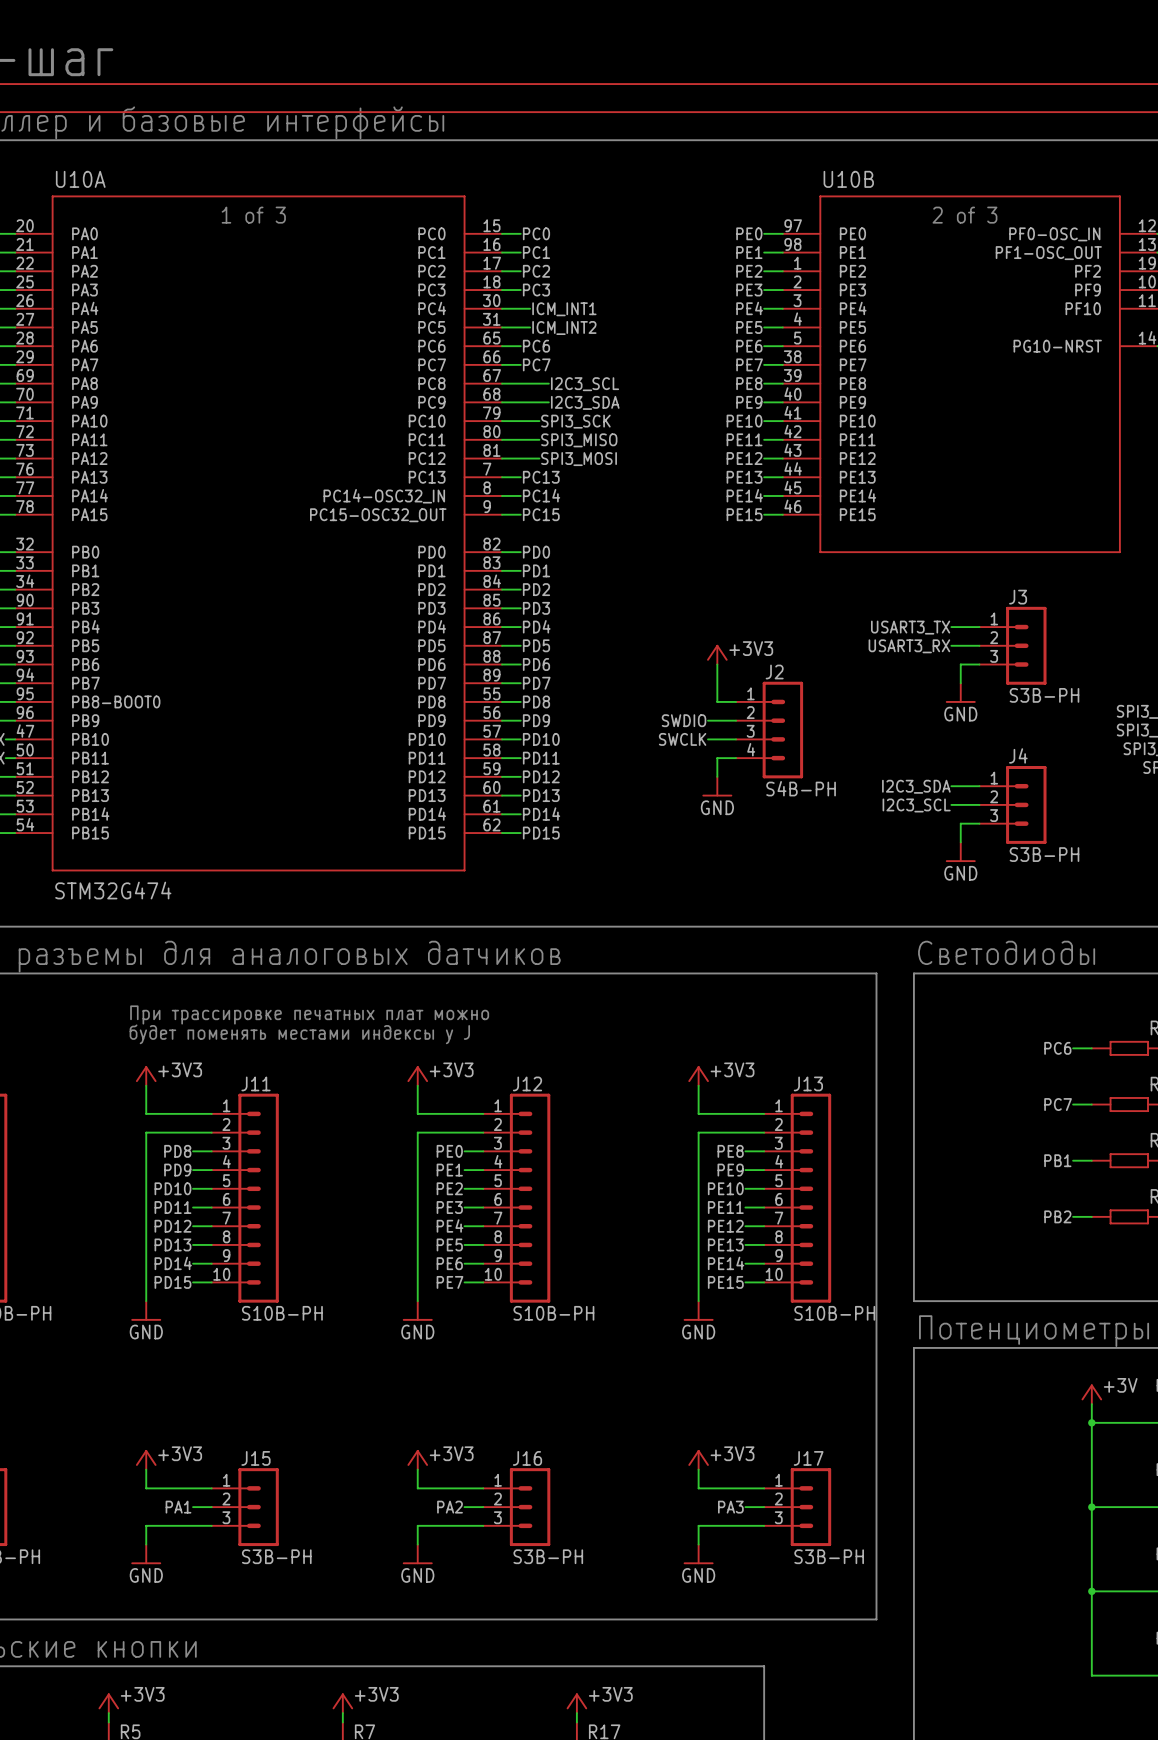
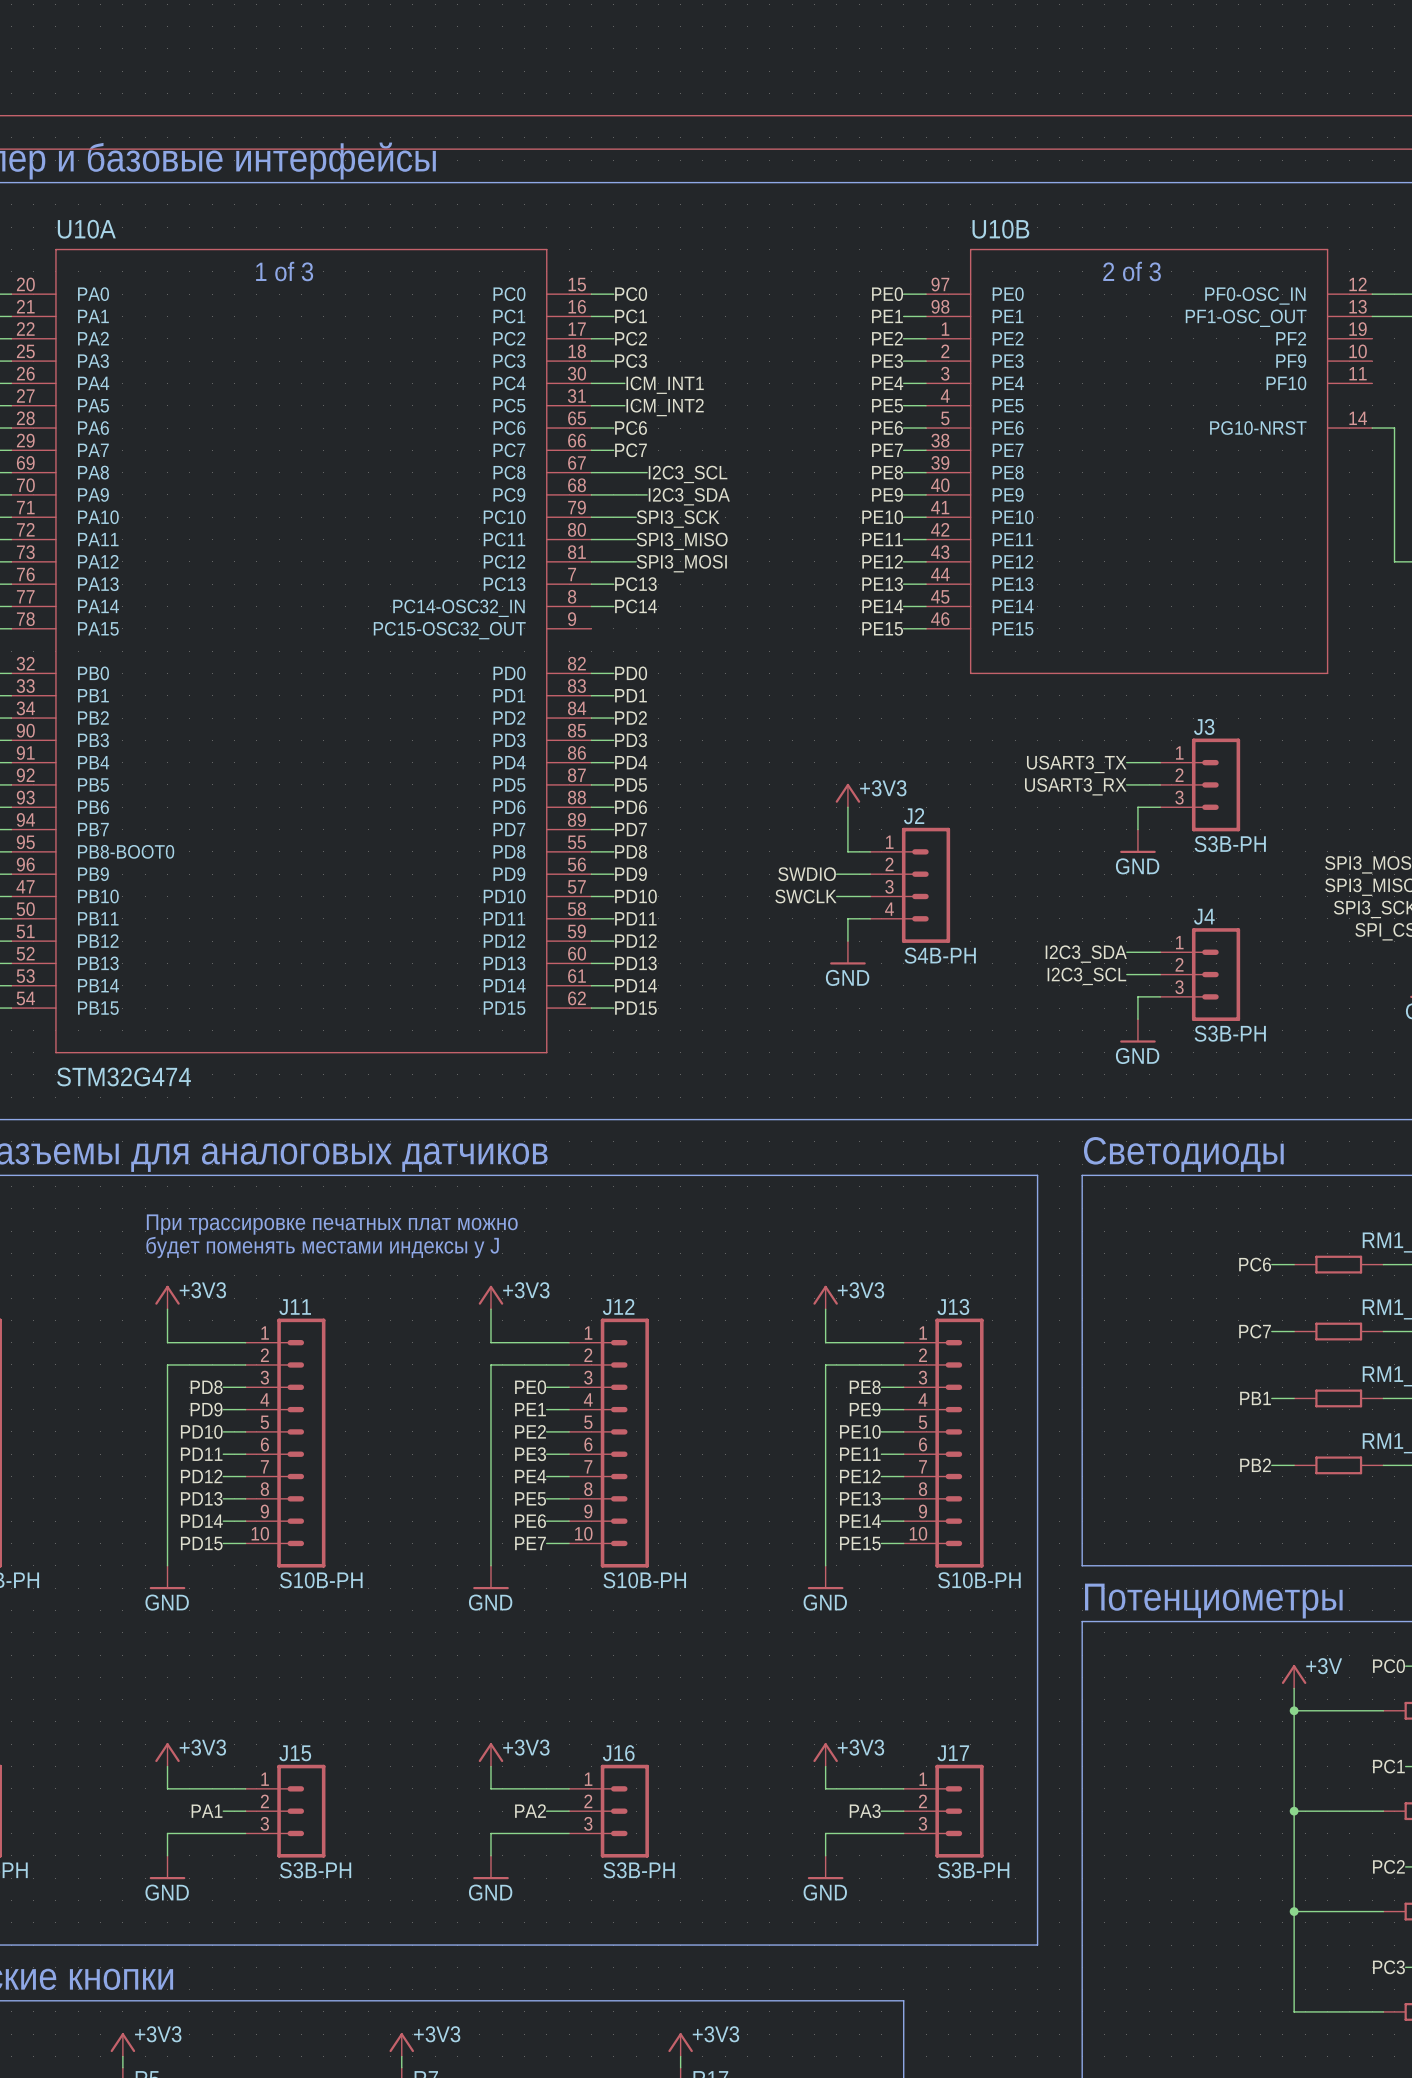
wire: (502, 514) (520, 514) -> none
label: PC15 (541, 514) -> none

